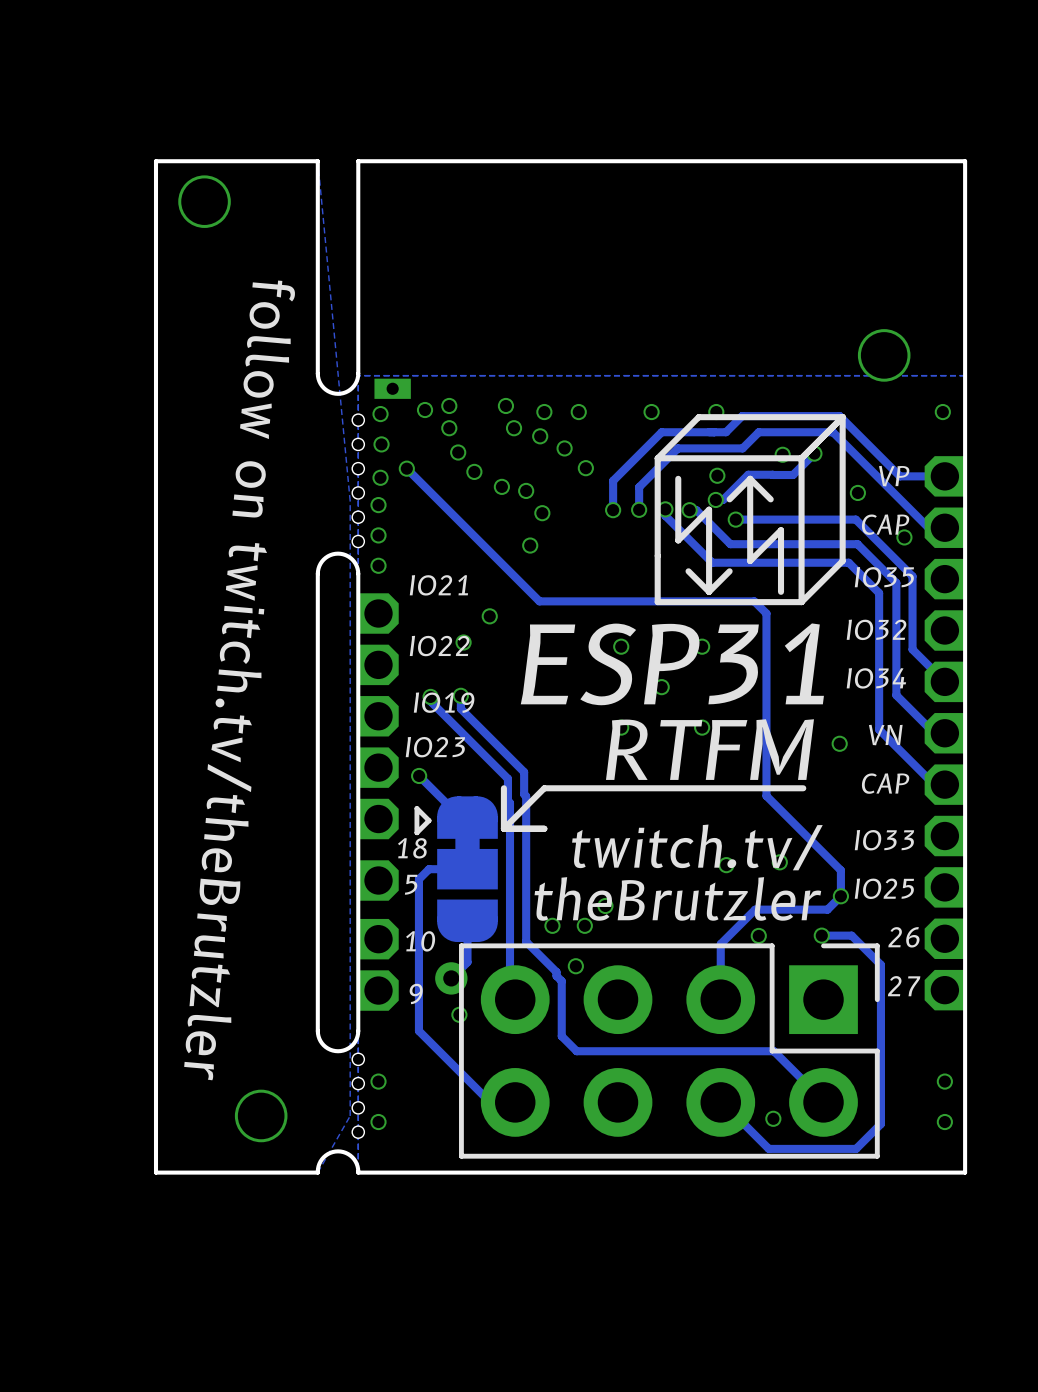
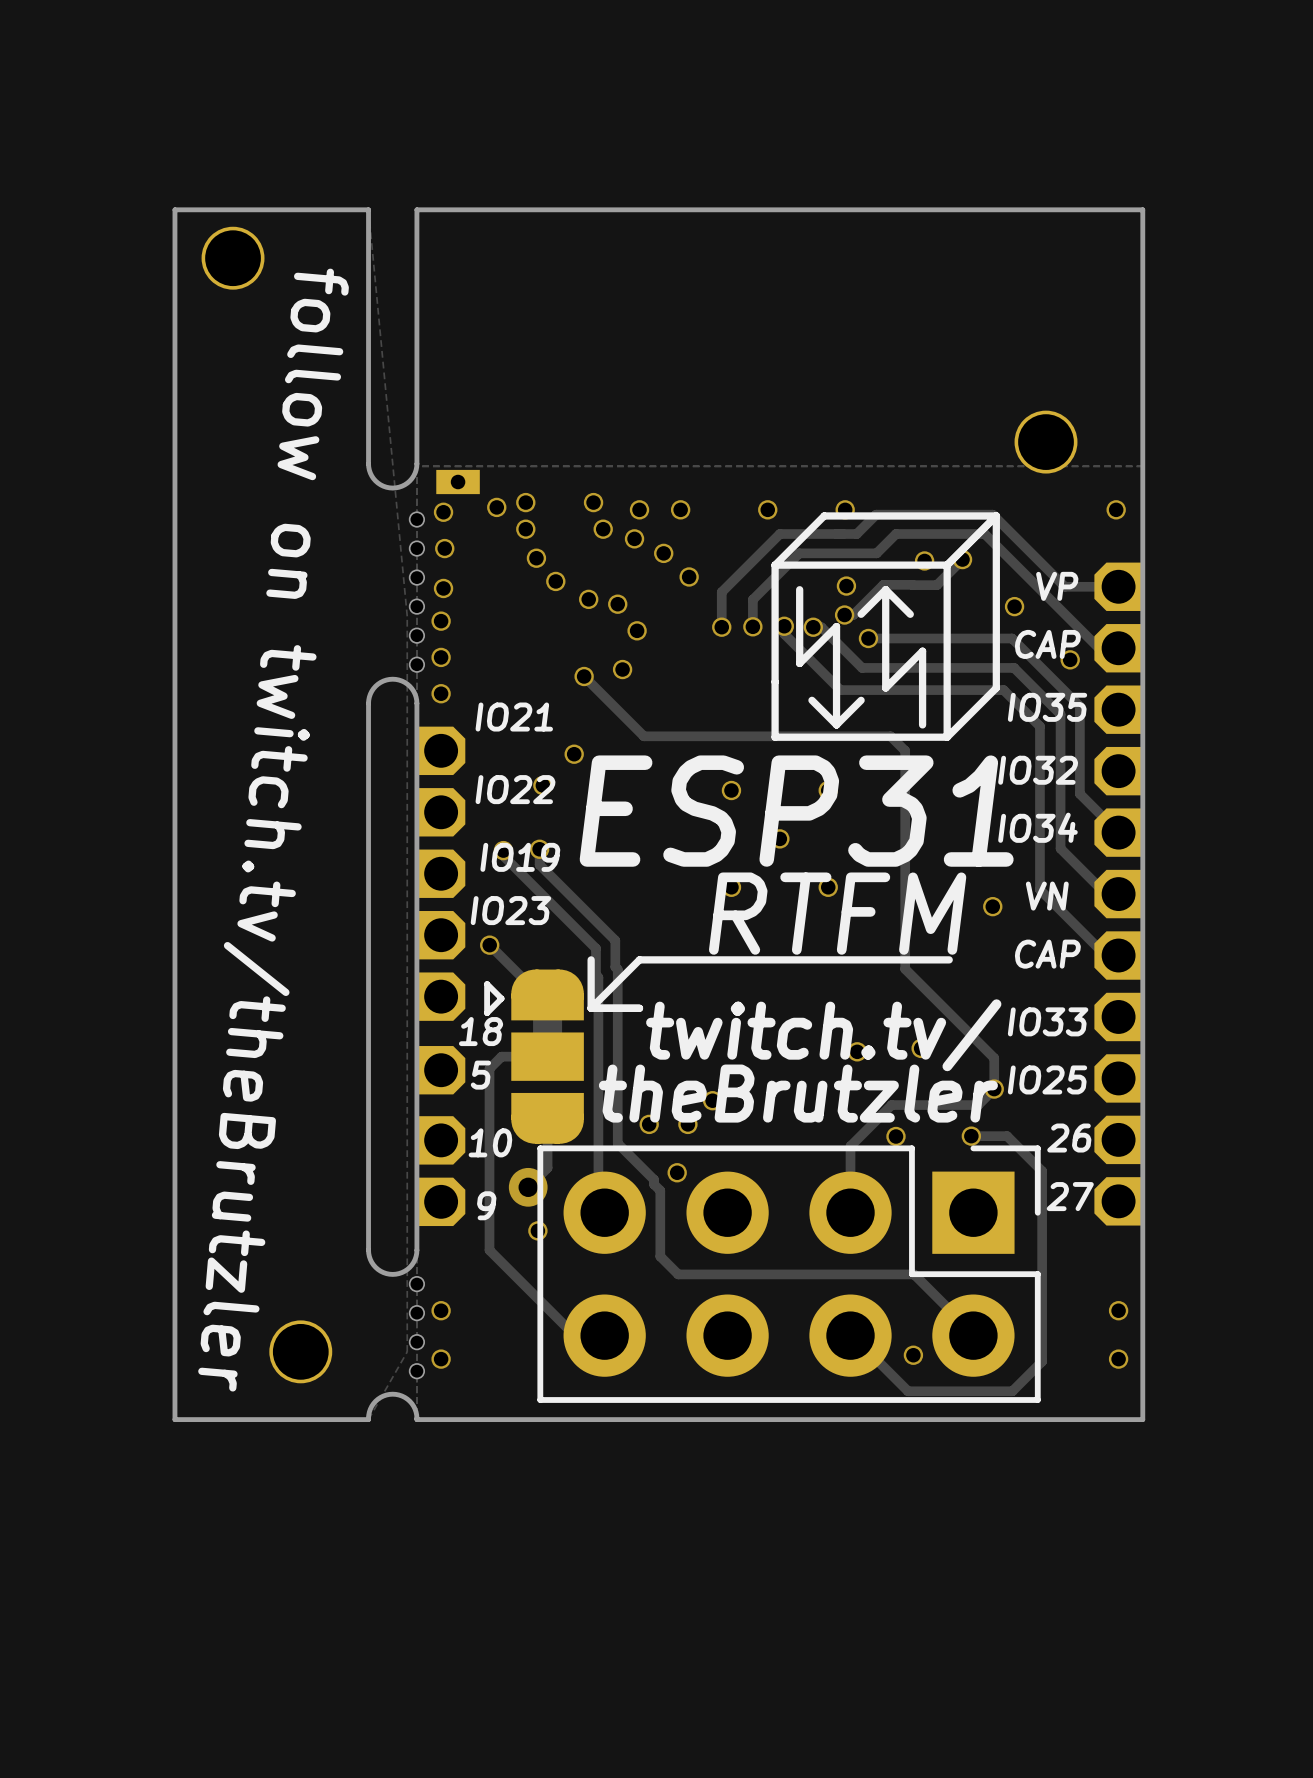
track: (406, 468) (539, 601) (548, 601) -> (584, 676) (643, 736)
via position: (406, 468) -> (584, 676)

